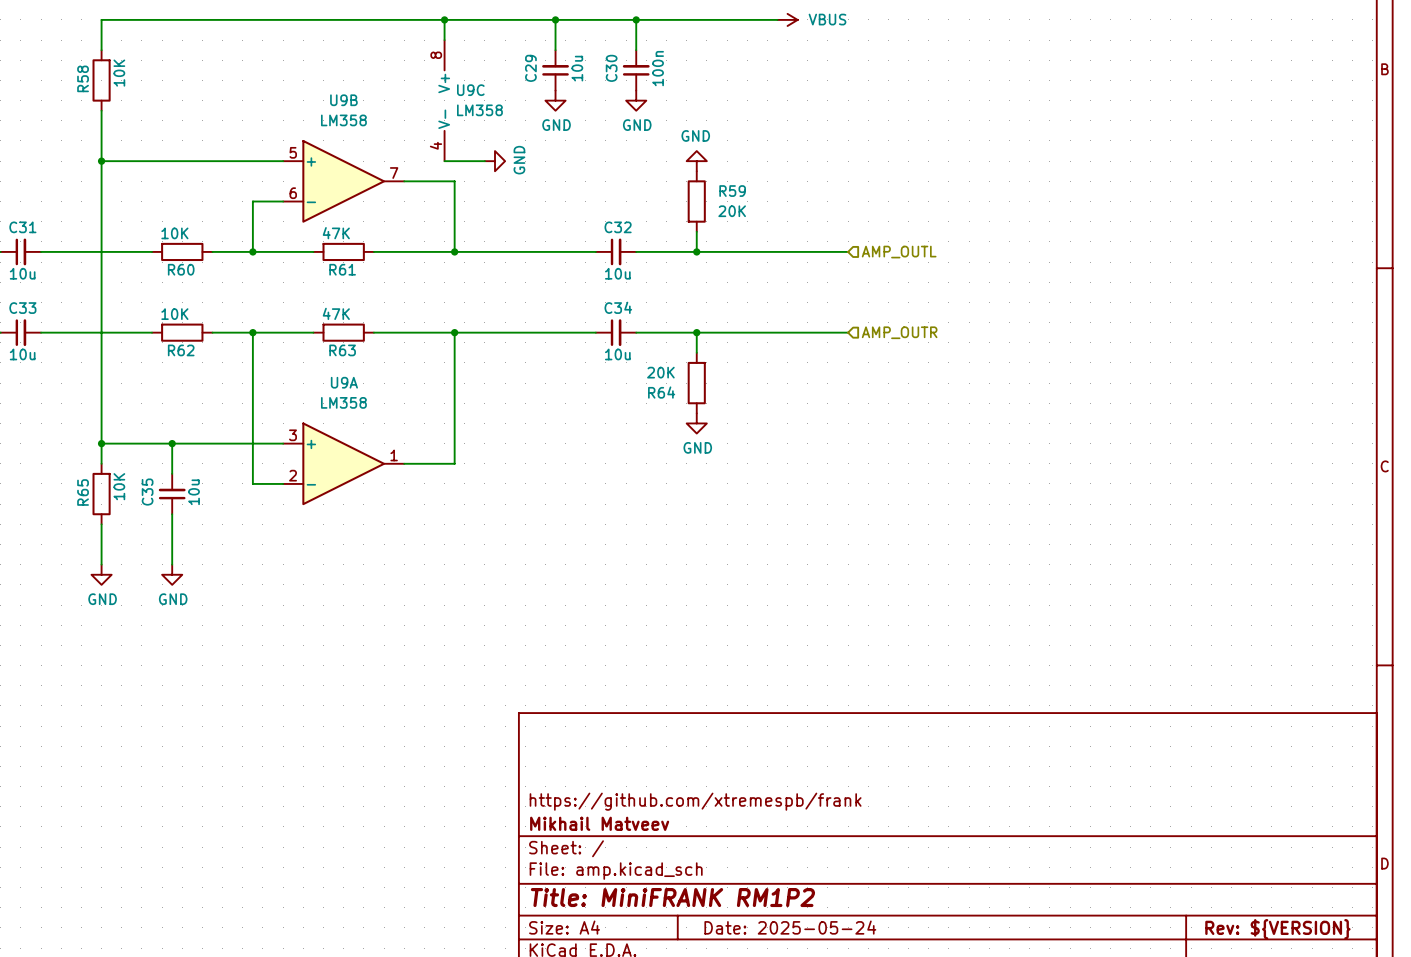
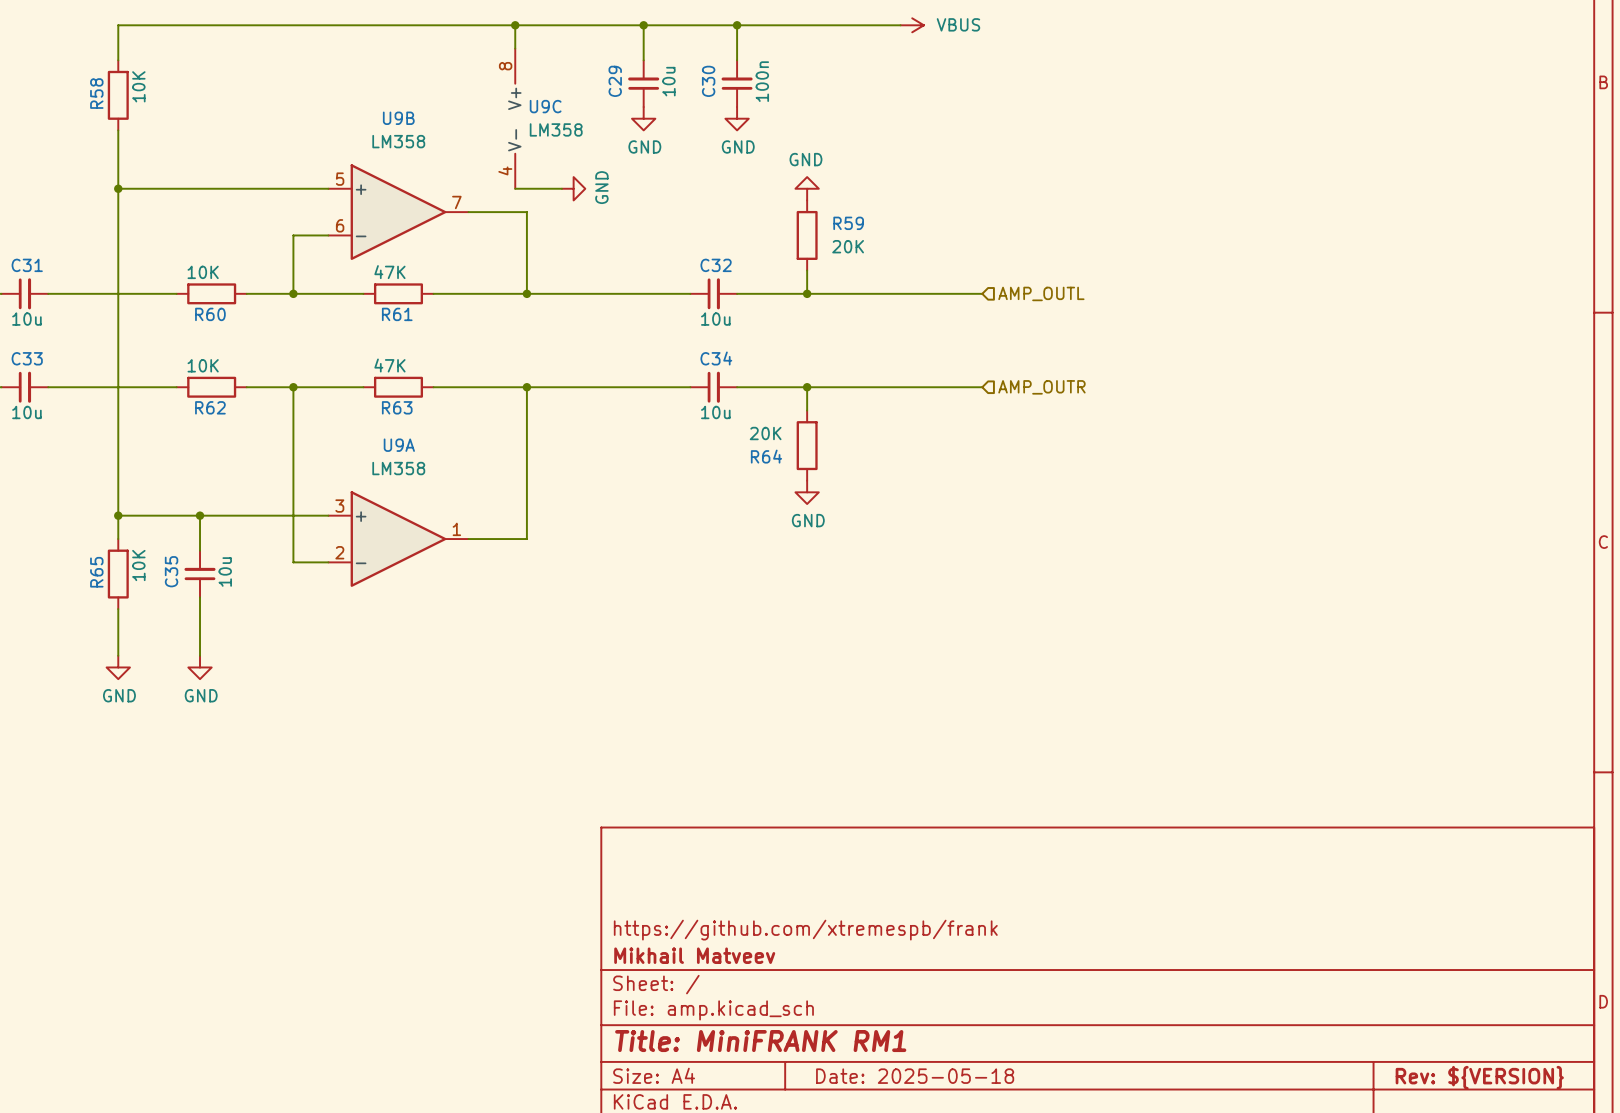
title block: Title: MiniFRANK RM1P2 (672, 897) -> Title: MiniFRANK RM1 (760, 1041)
title block: Date: 2025-05-24 (790, 927) -> Date: 2025-05-18 (915, 1076)

